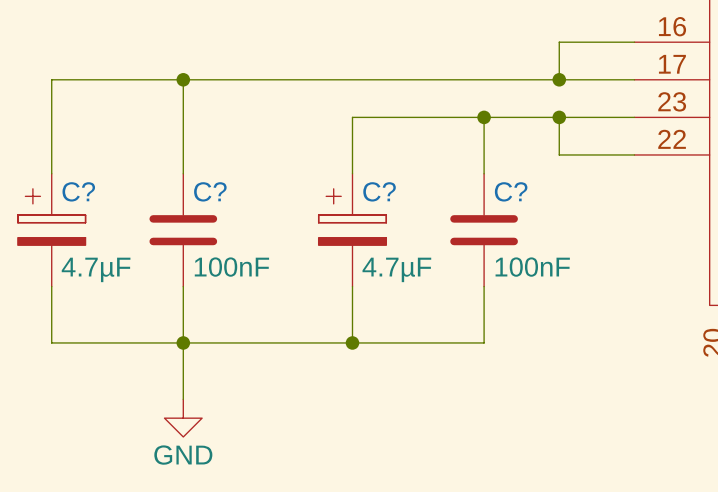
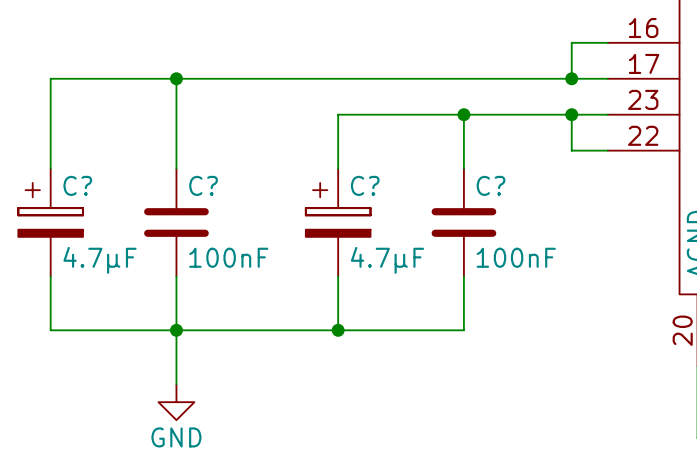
wire: (596, 42) (559, 42) (559, 79) -> (571, 42) (571, 78)
junction: (559, 79) -> none
junction: none -> (571, 78)
wire: (559, 117) (559, 154) (596, 154) -> (571, 114) (571, 150)
junction: (559, 117) -> none
junction: none -> (571, 114)

